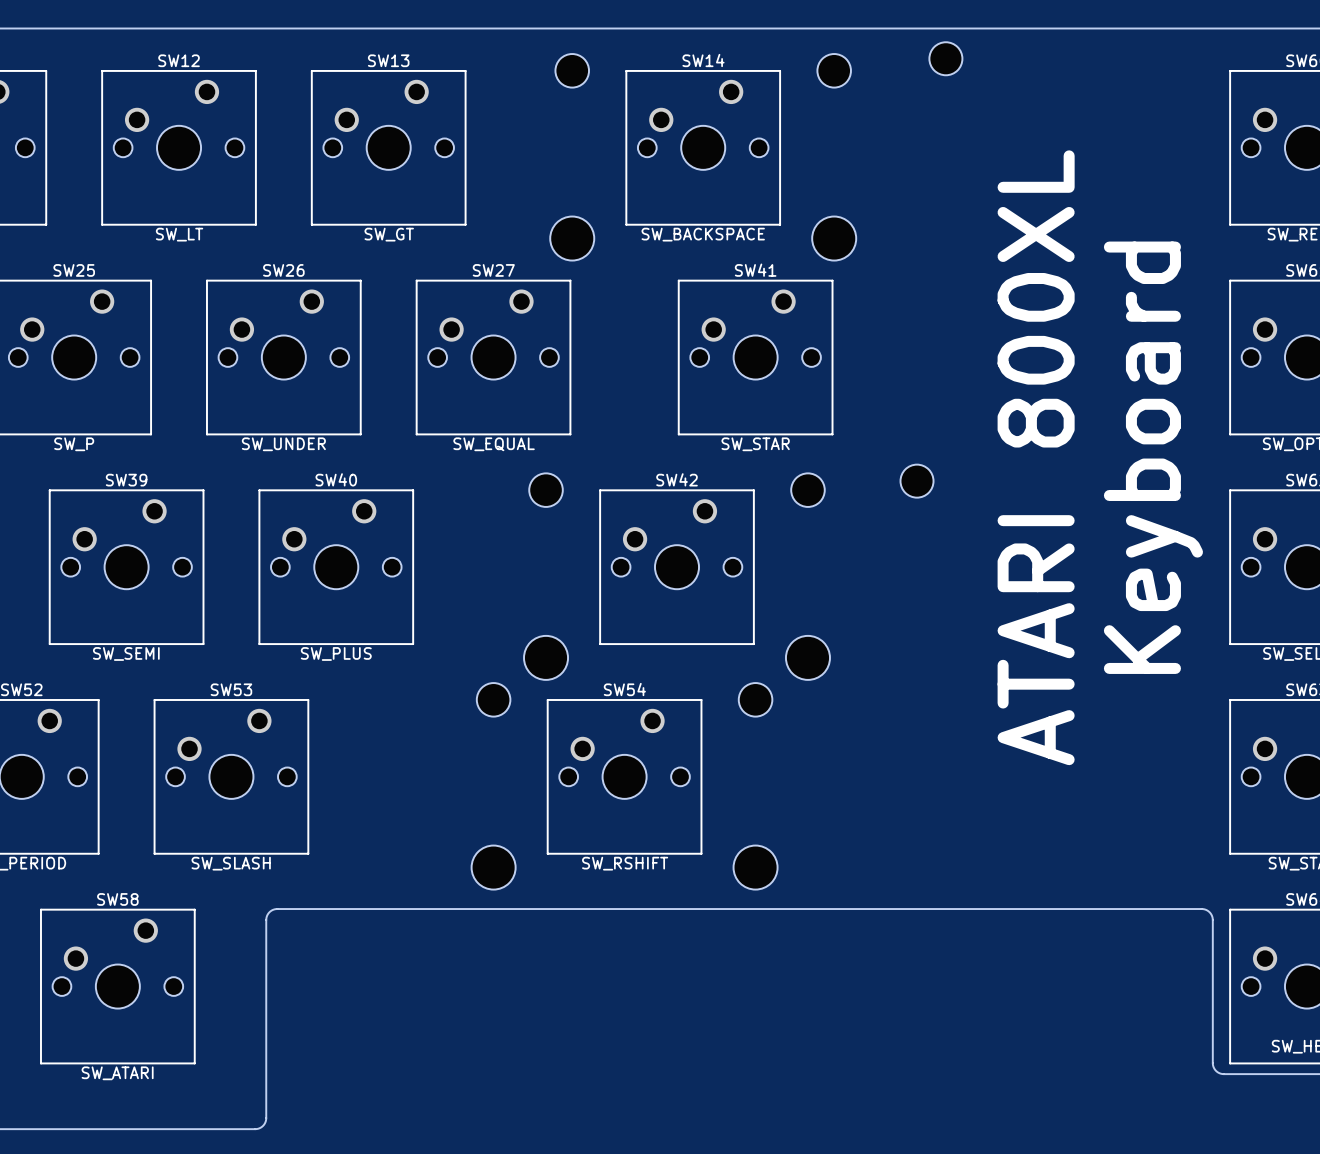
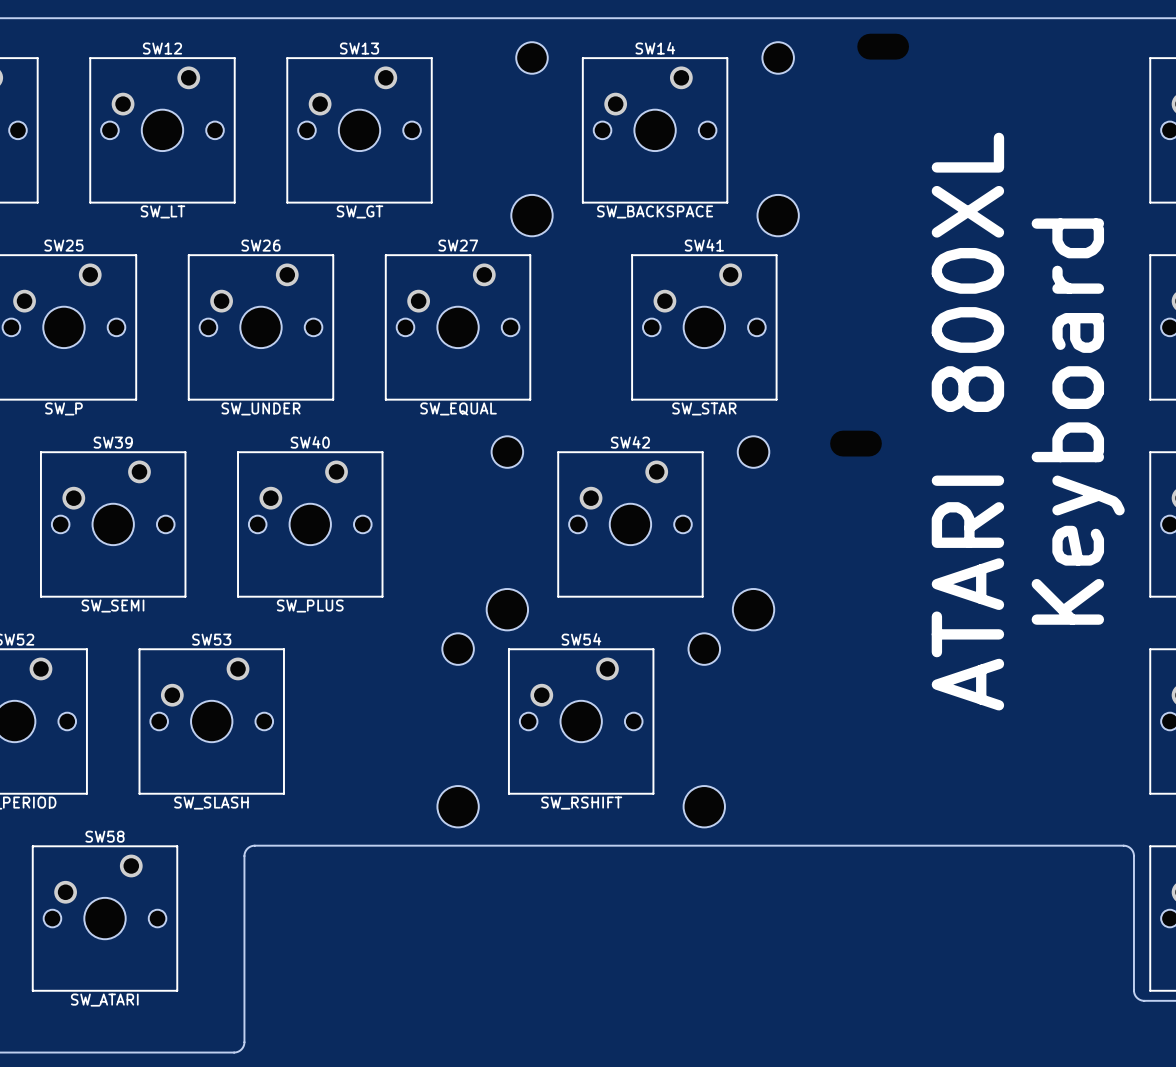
part footprint: [929, 42, 963, 76] -> [857, 33, 910, 60]
part footprint: [900, 464, 934, 498] -> [830, 430, 882, 457]

